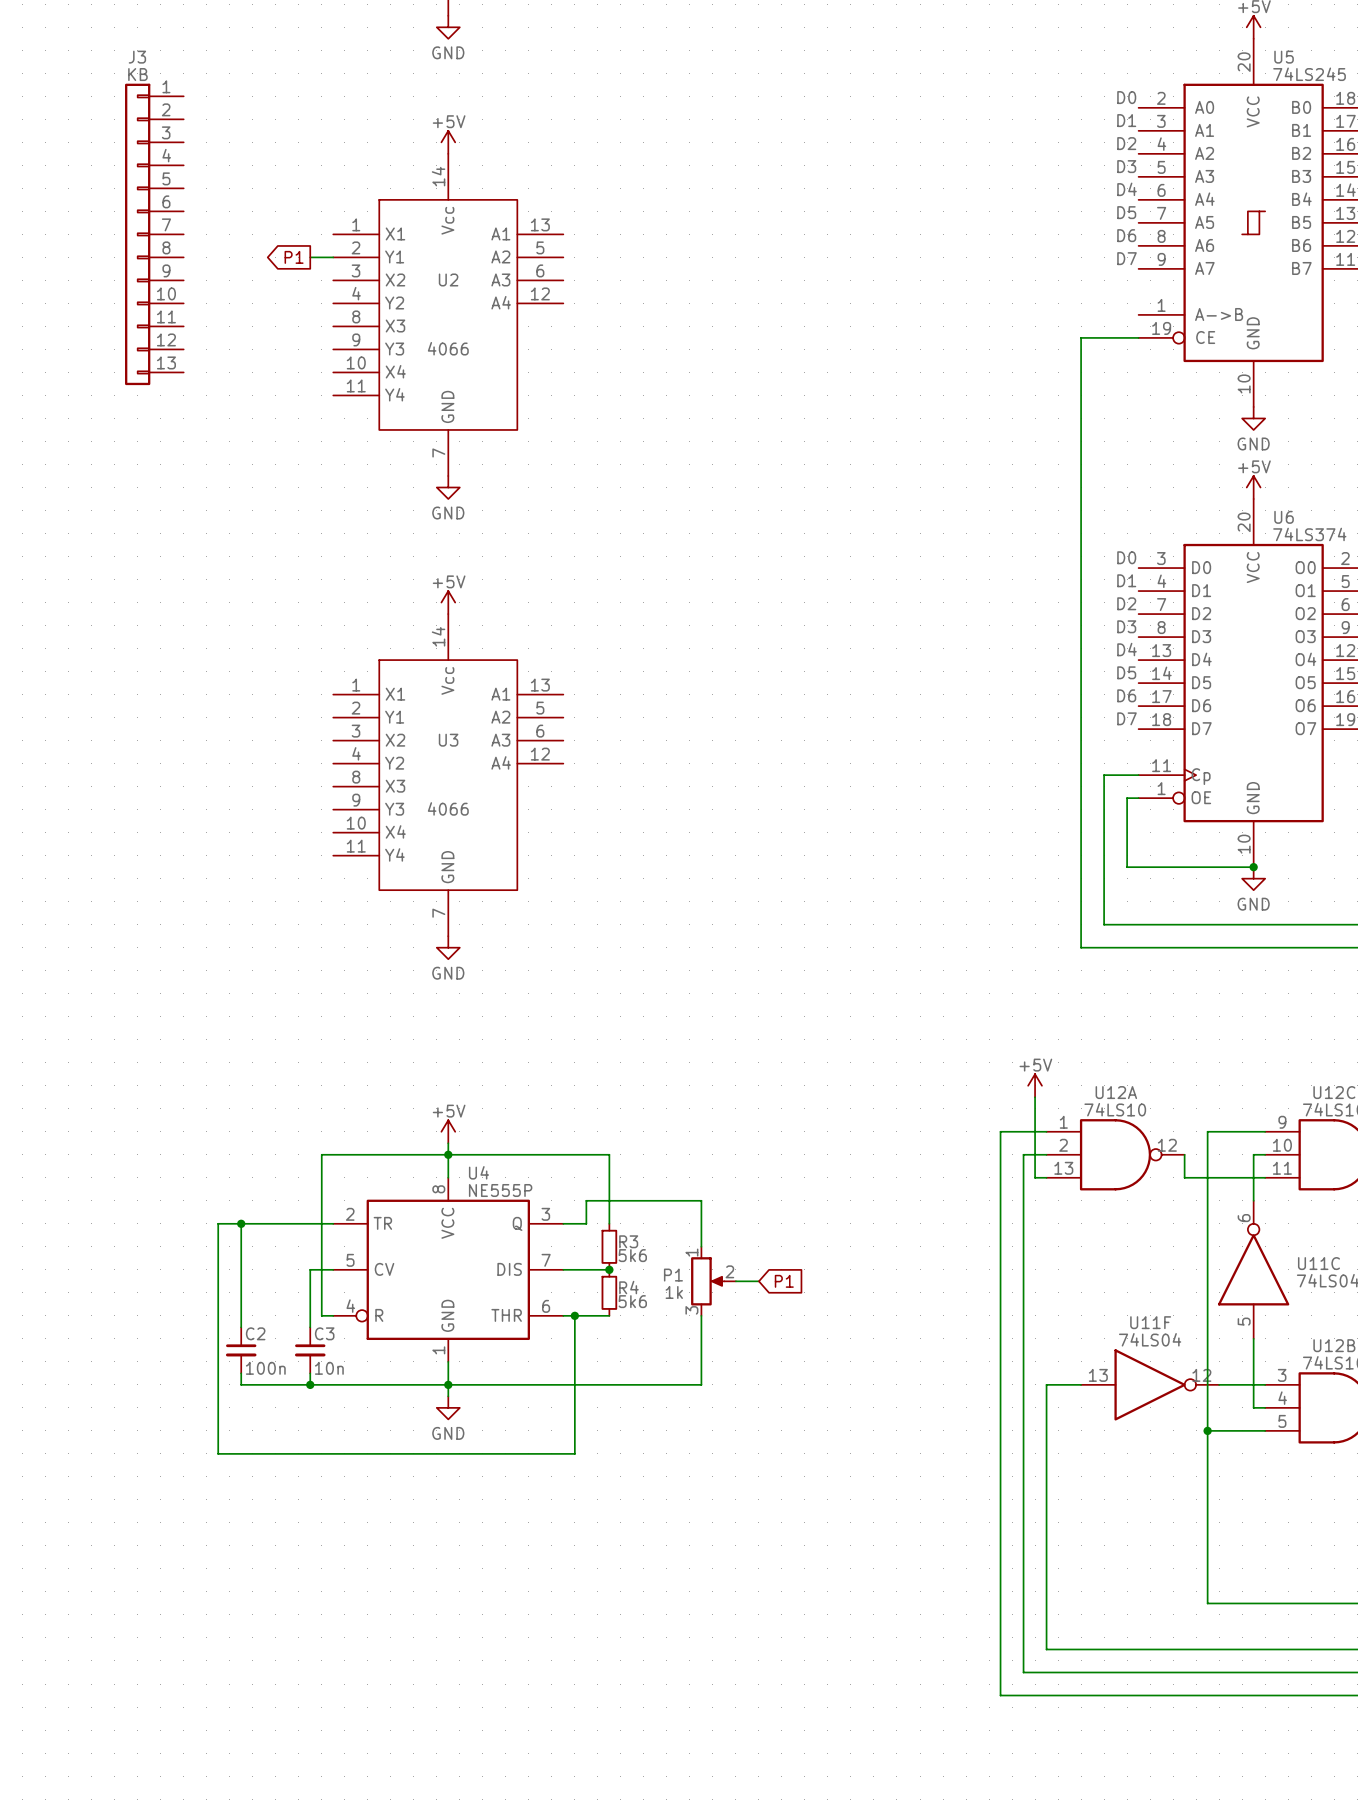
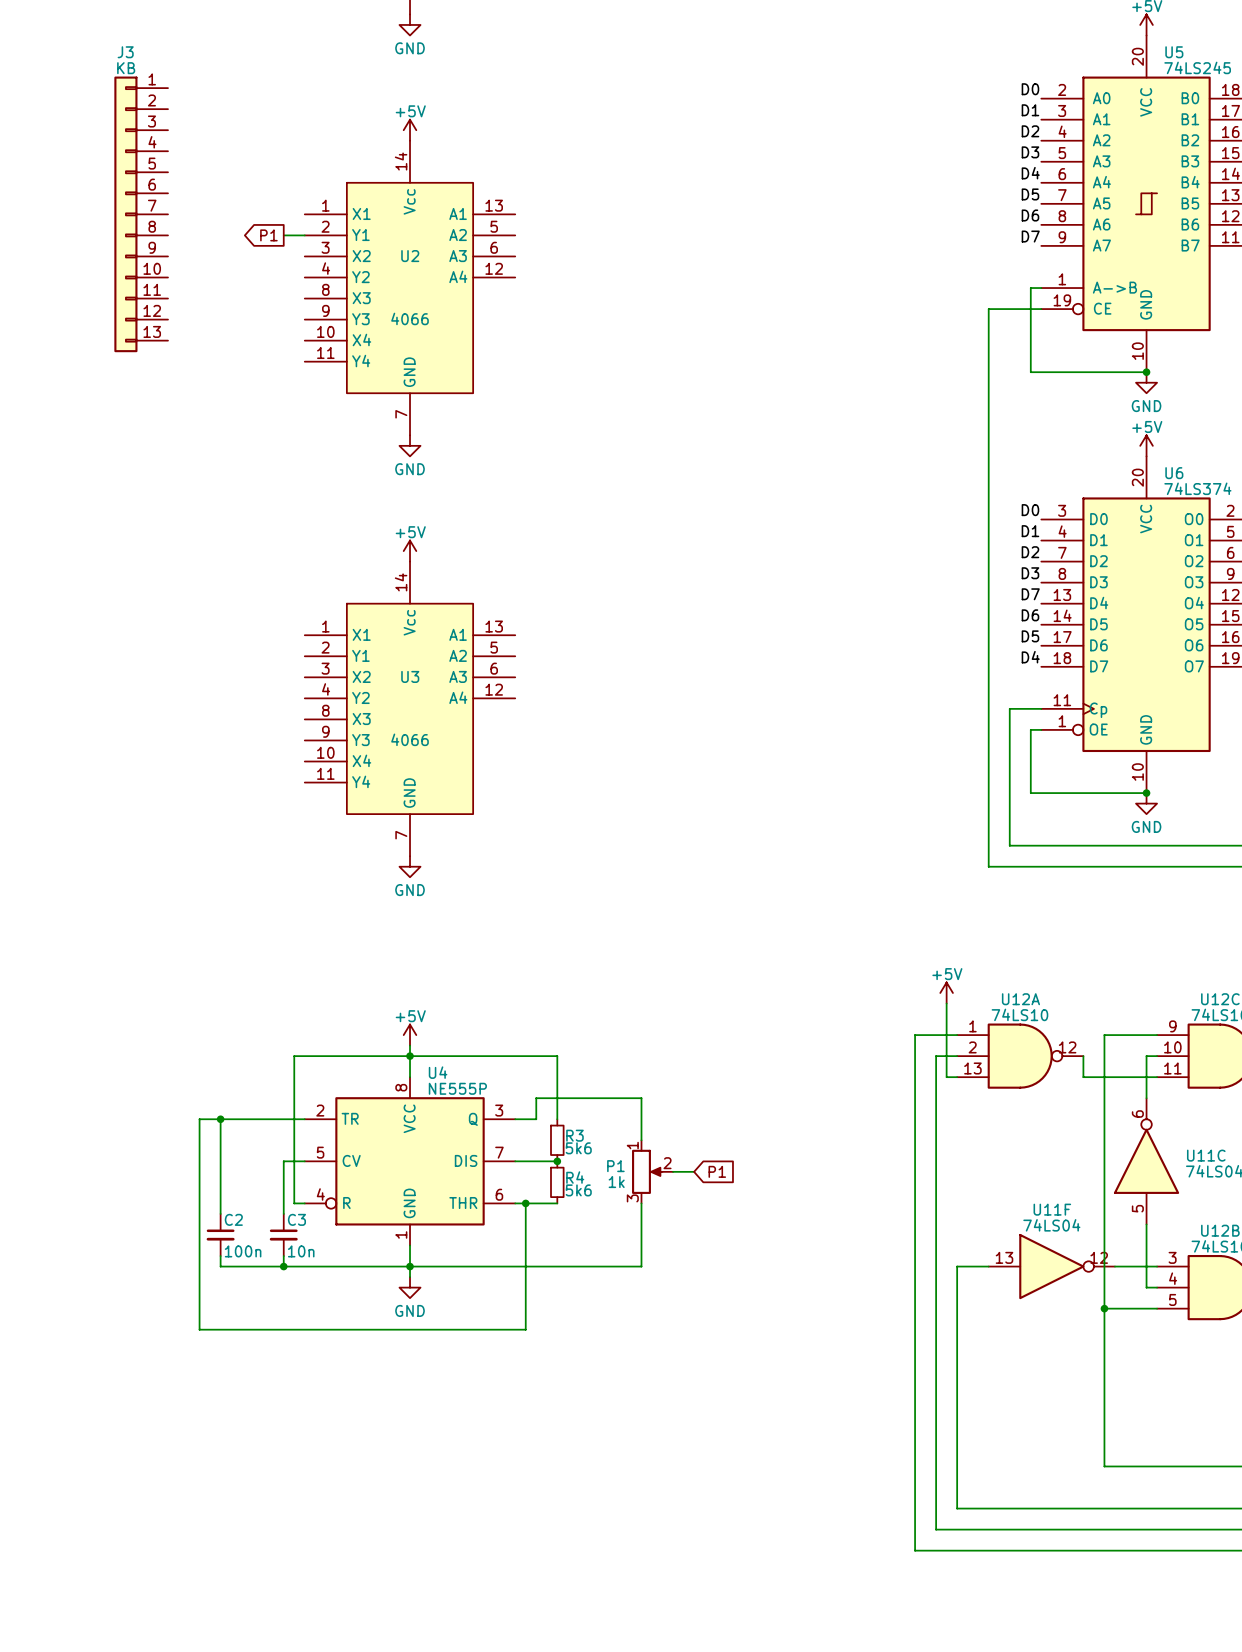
wire: none -> (1041, 288) (1030, 288) (1030, 372) (1146, 372)
junction: none -> (1146, 372)
label: D4 (1127, 649) -> D7 (1030, 594)
label: D5 (1126, 672) -> D6 (1030, 615)
label: D6 (1126, 695) -> D5 (1030, 636)
label: D7 (1127, 718) -> D4 (1030, 657)

